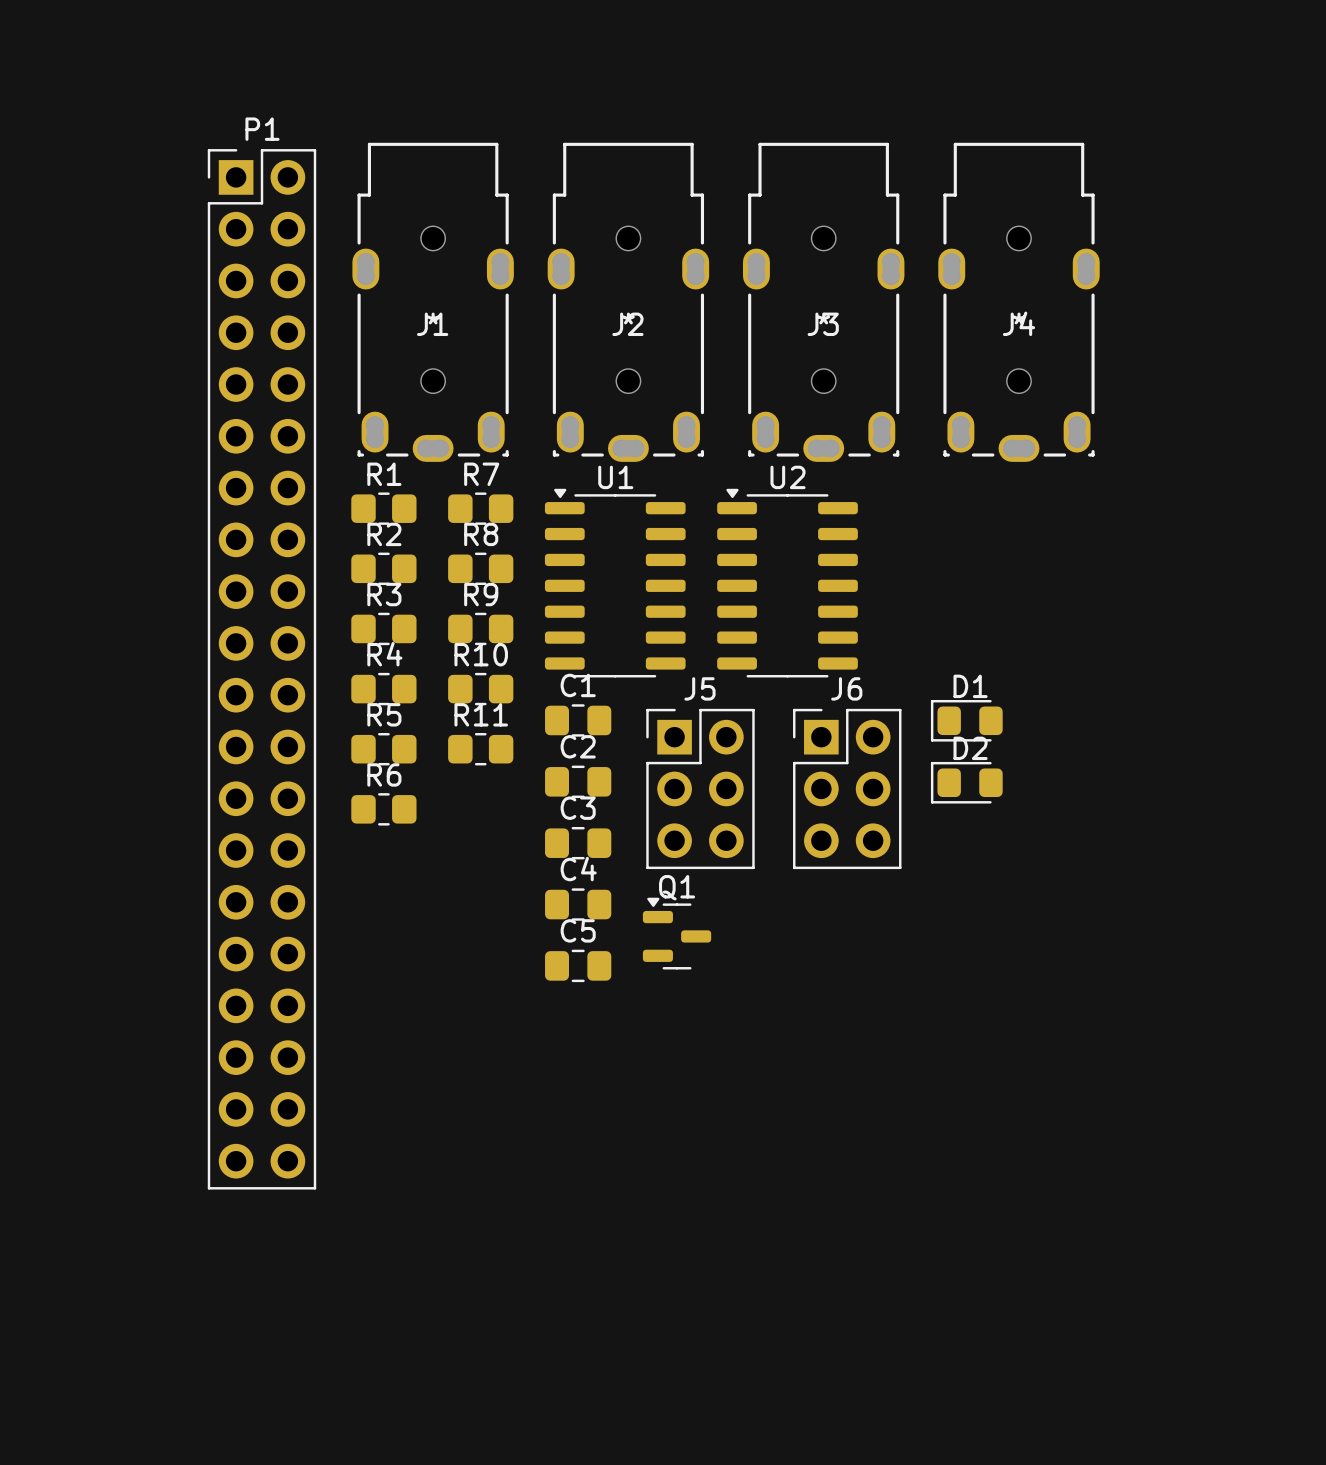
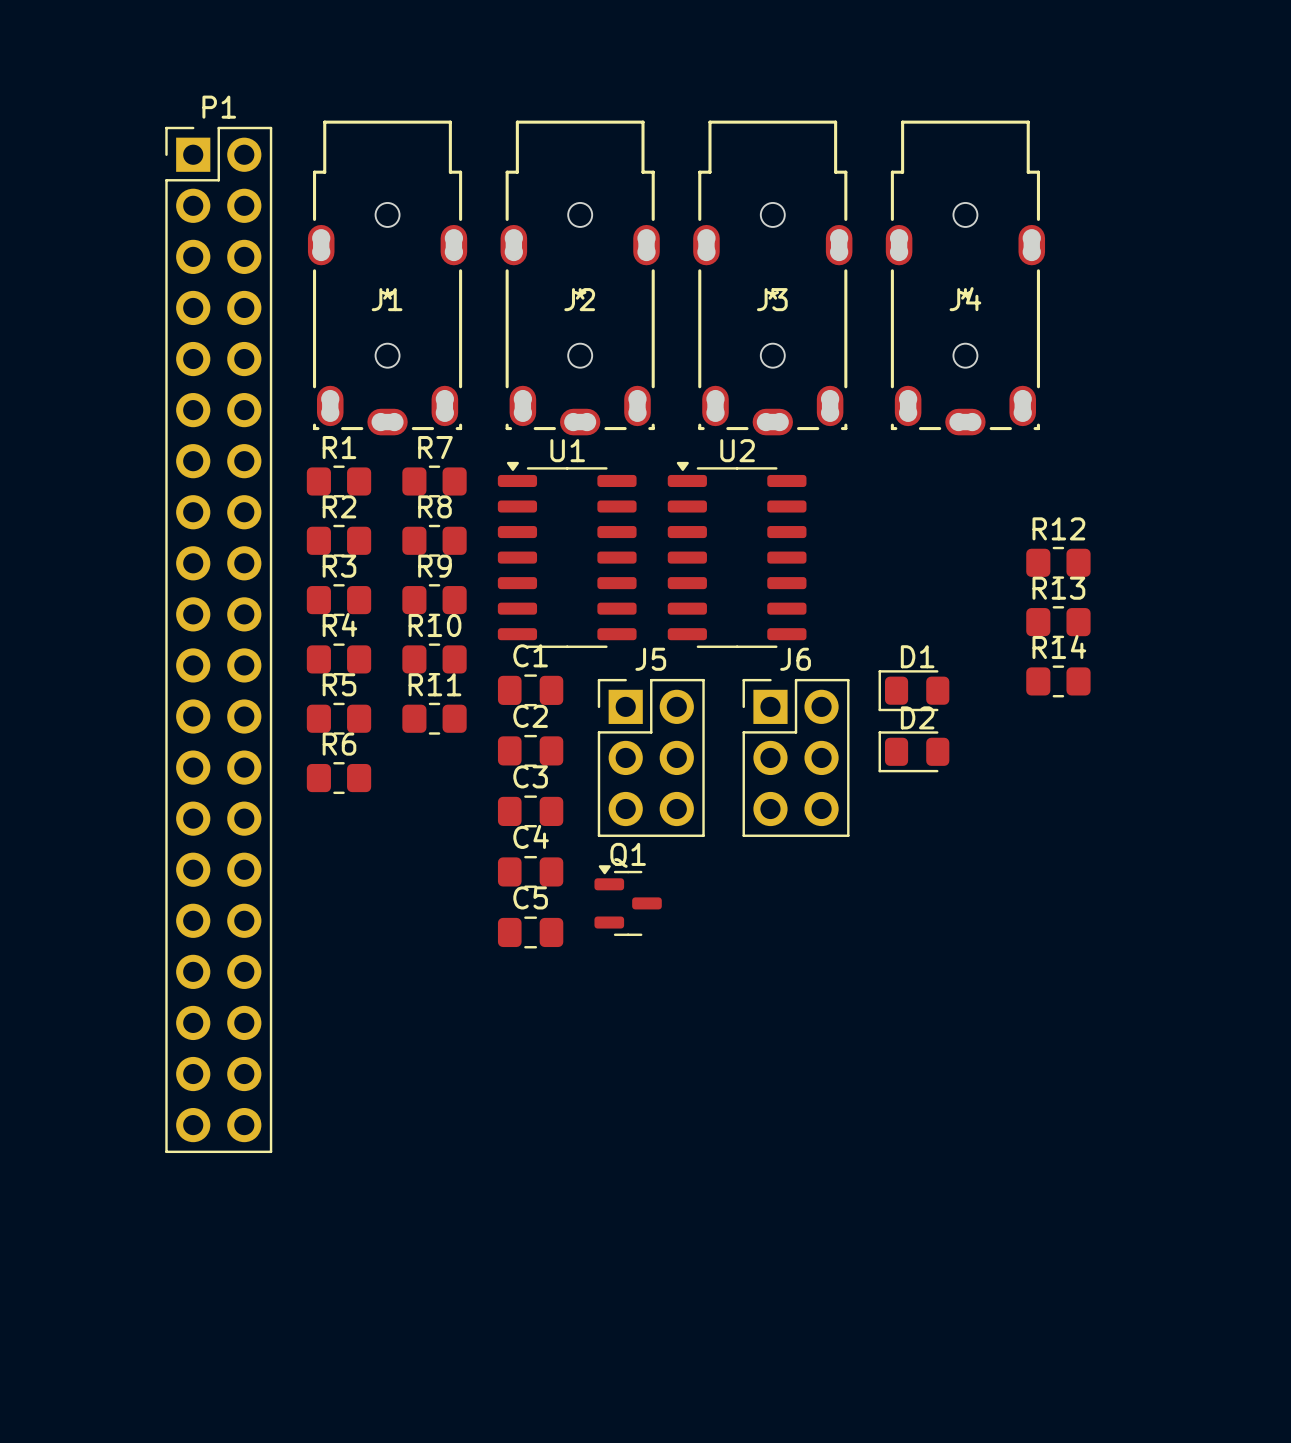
R12: none -> (1058, 562)
R13: none -> (1058, 622)
R14: none -> (1058, 681)

